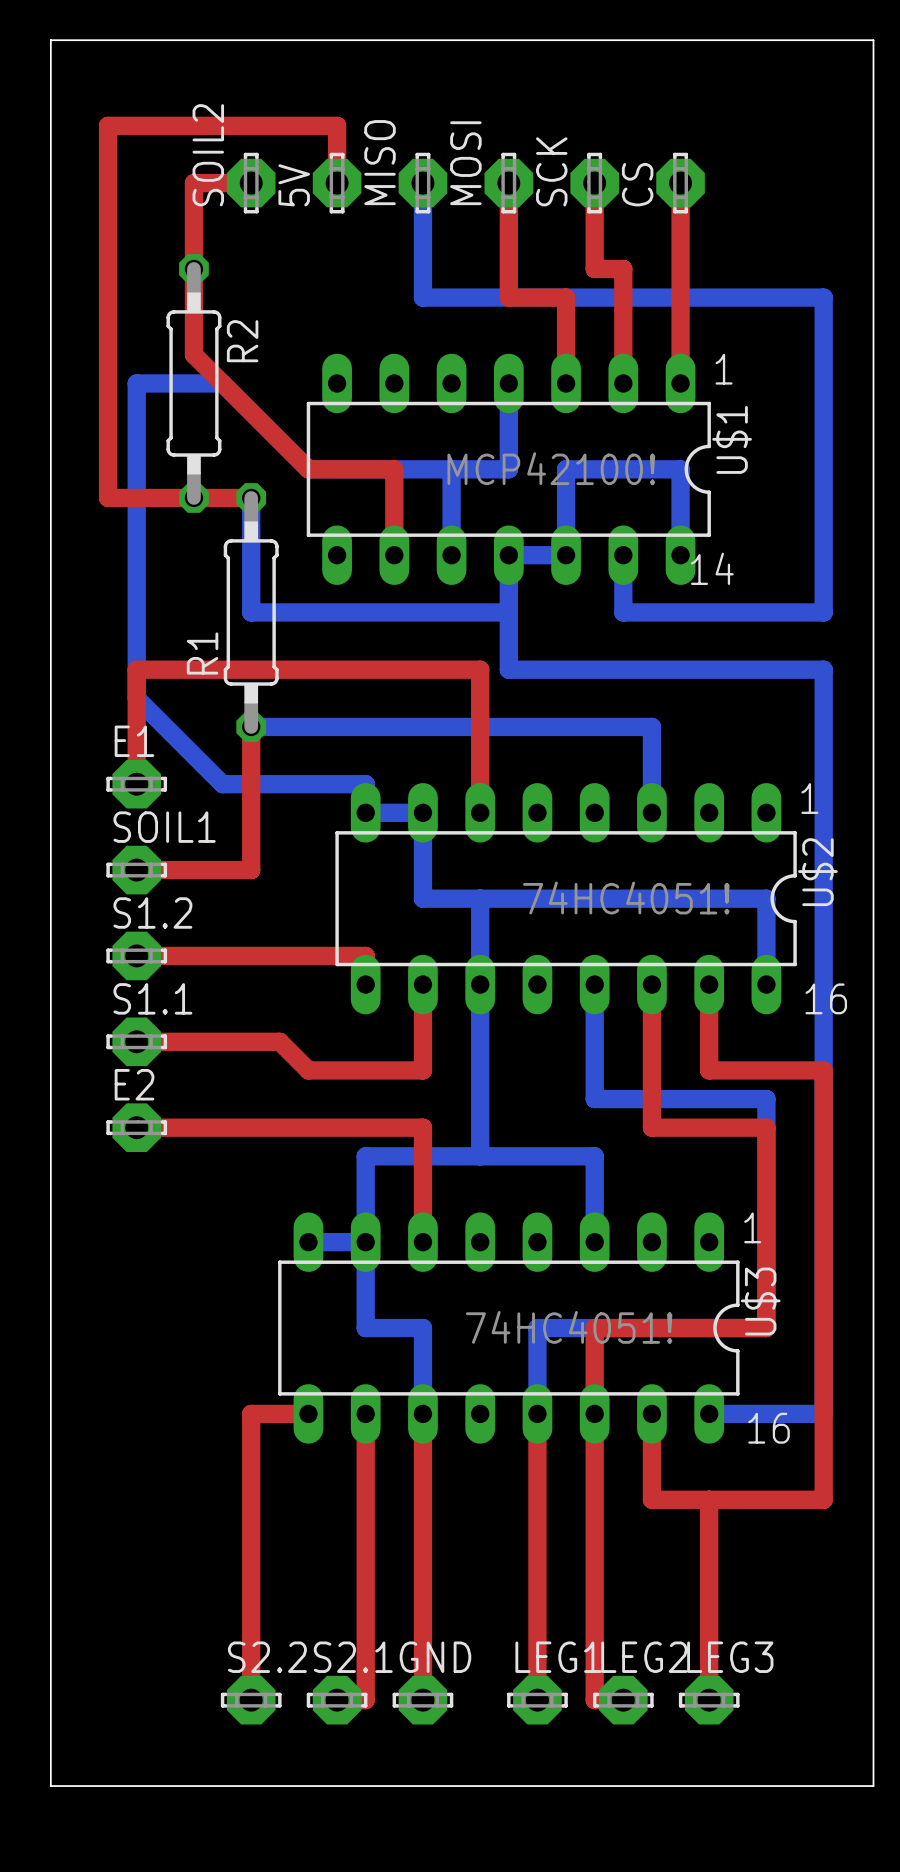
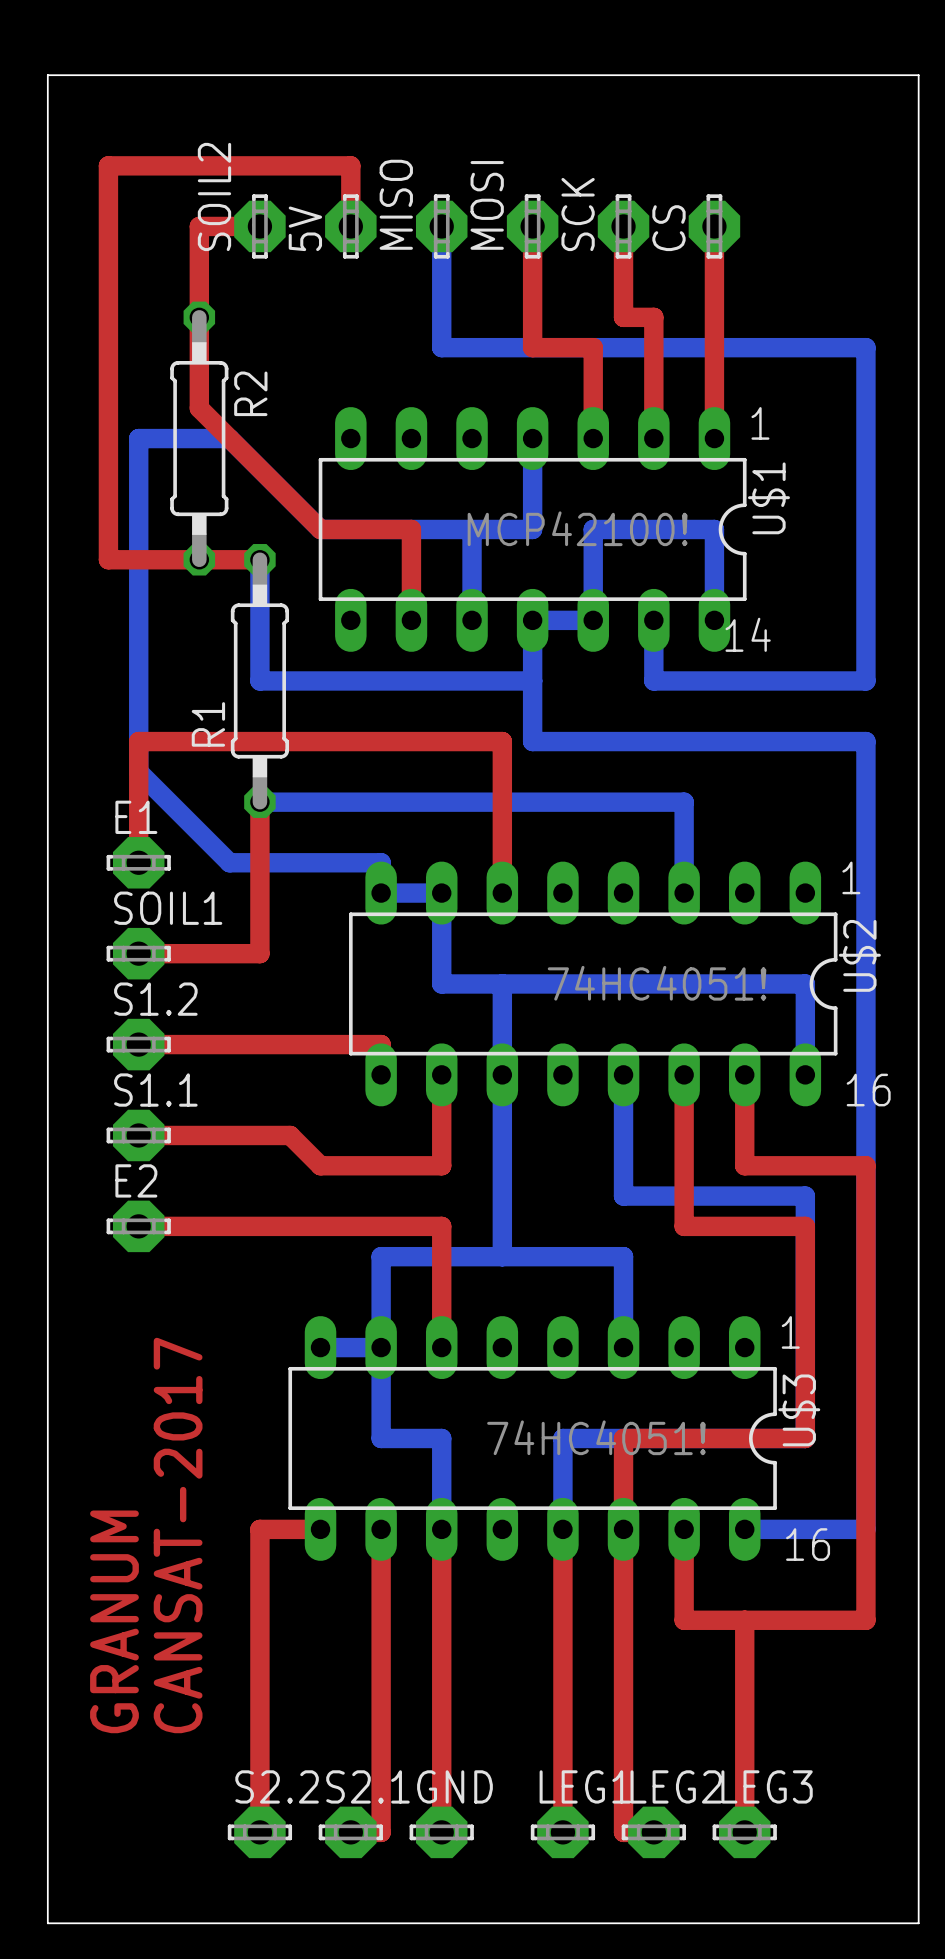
text: none -> CANSAT-2017 (178, 1535)
text: none -> GRANUM (114, 1621)

